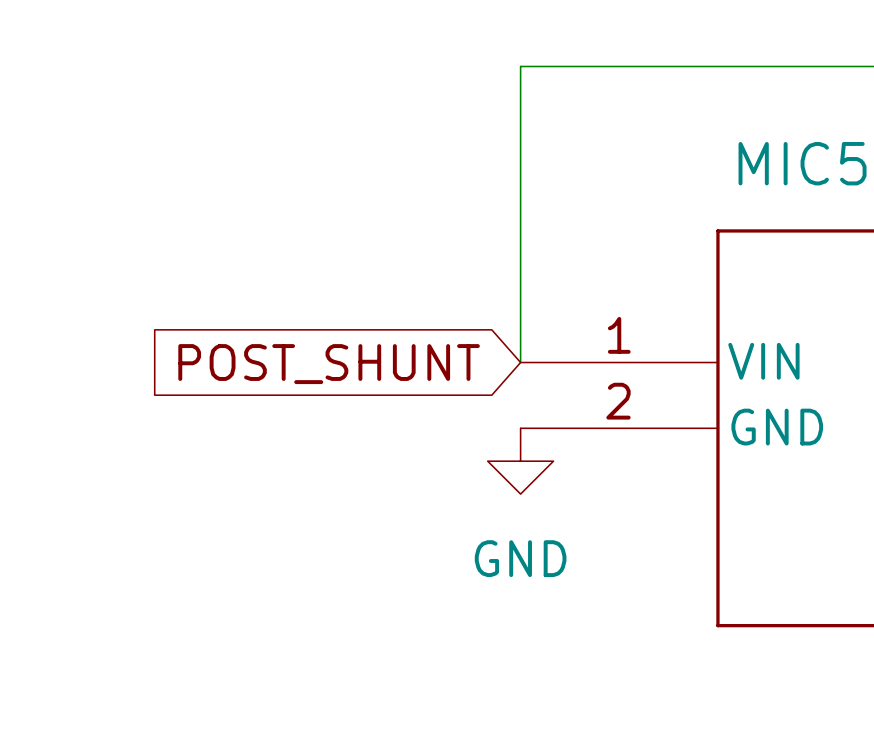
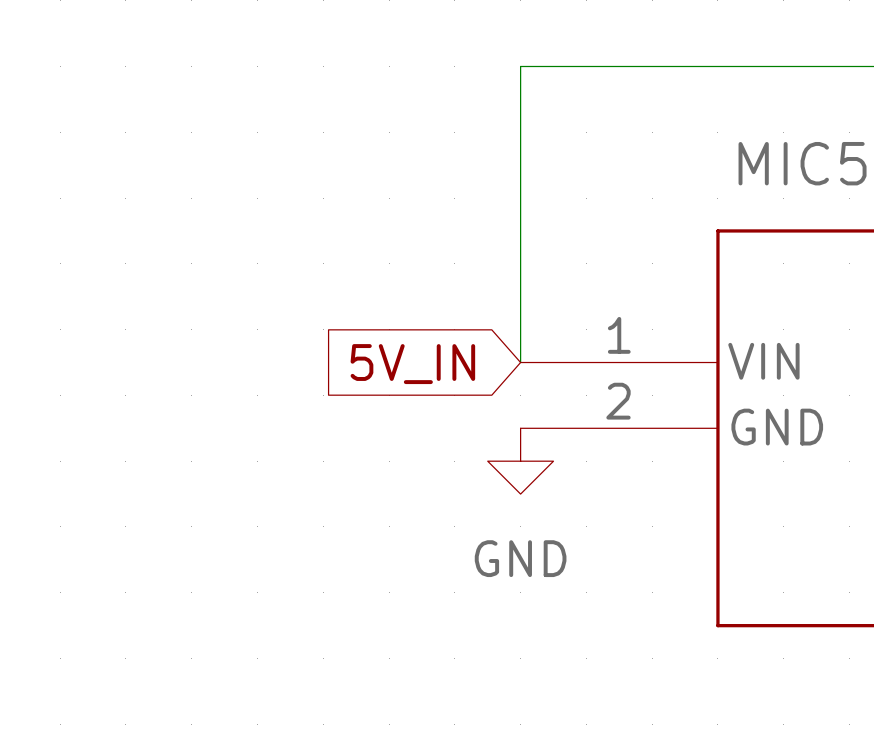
global label: POST_SHUNT (329, 364) -> 5V_IN (412, 364)

